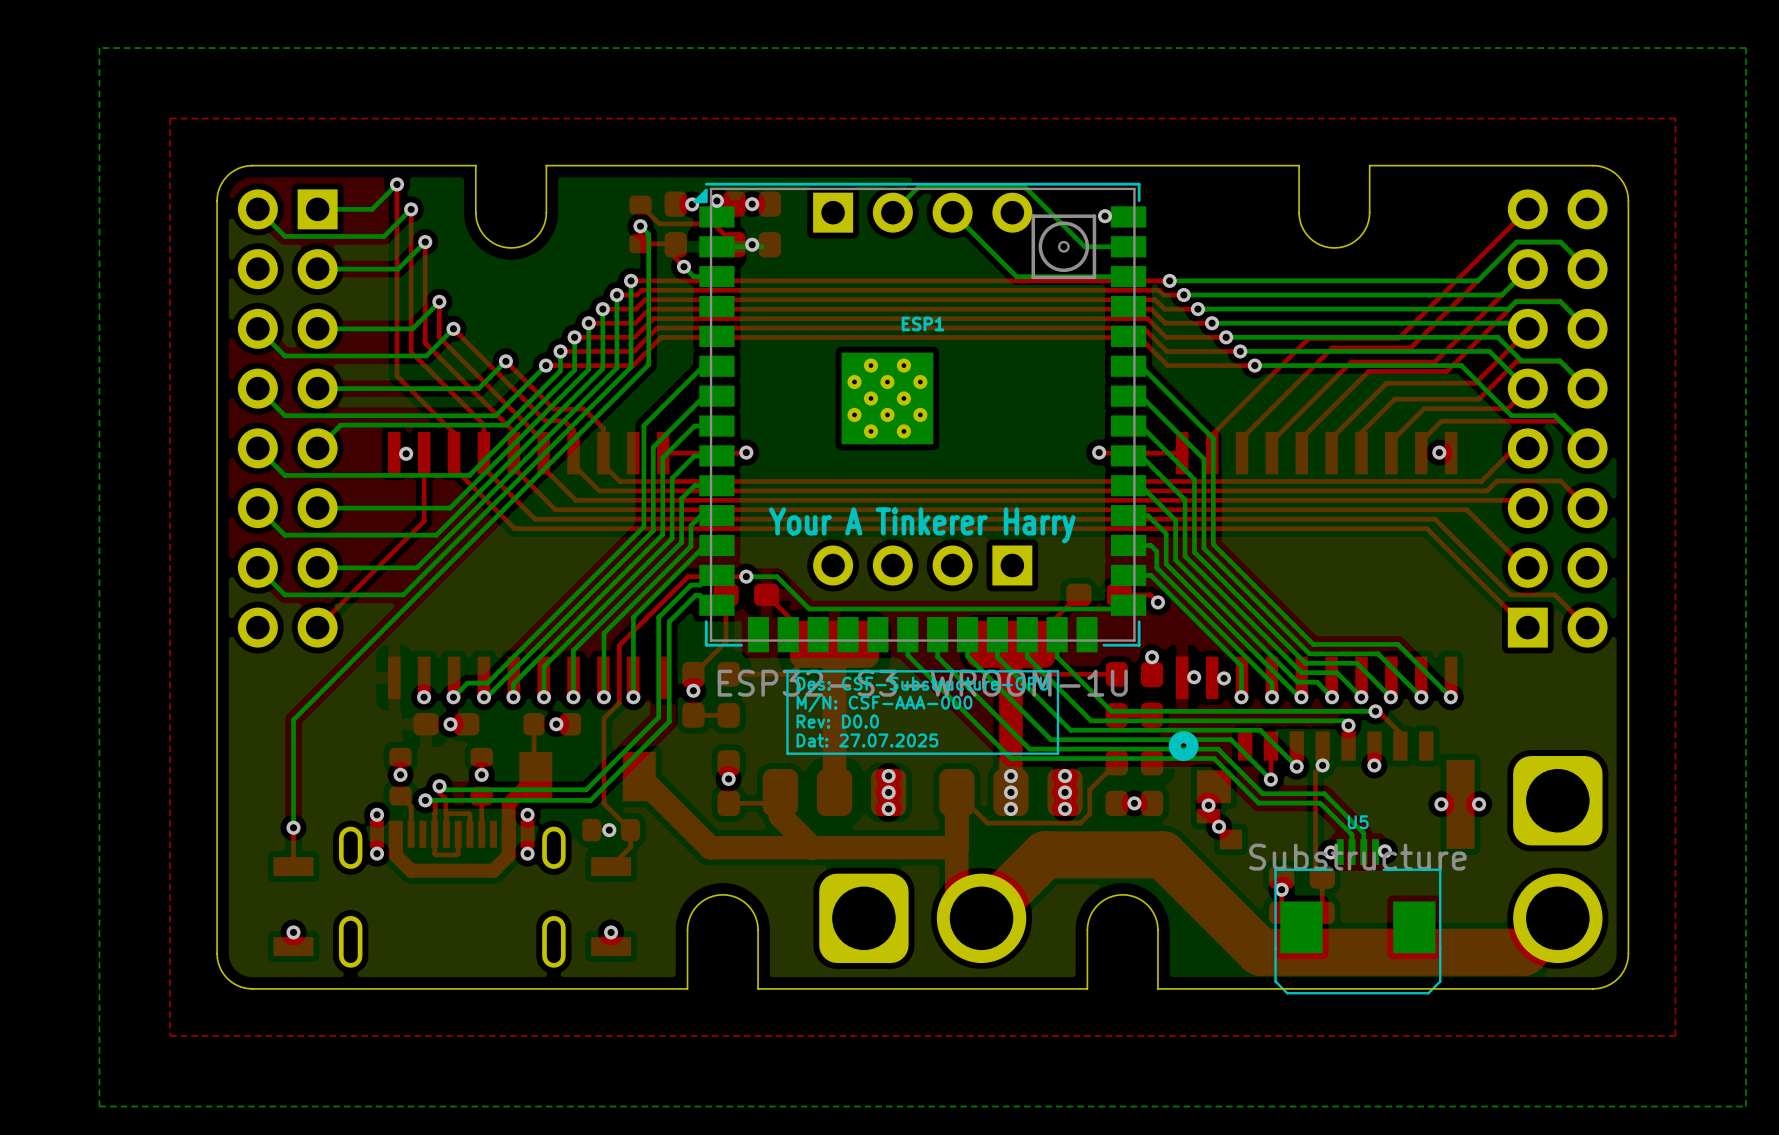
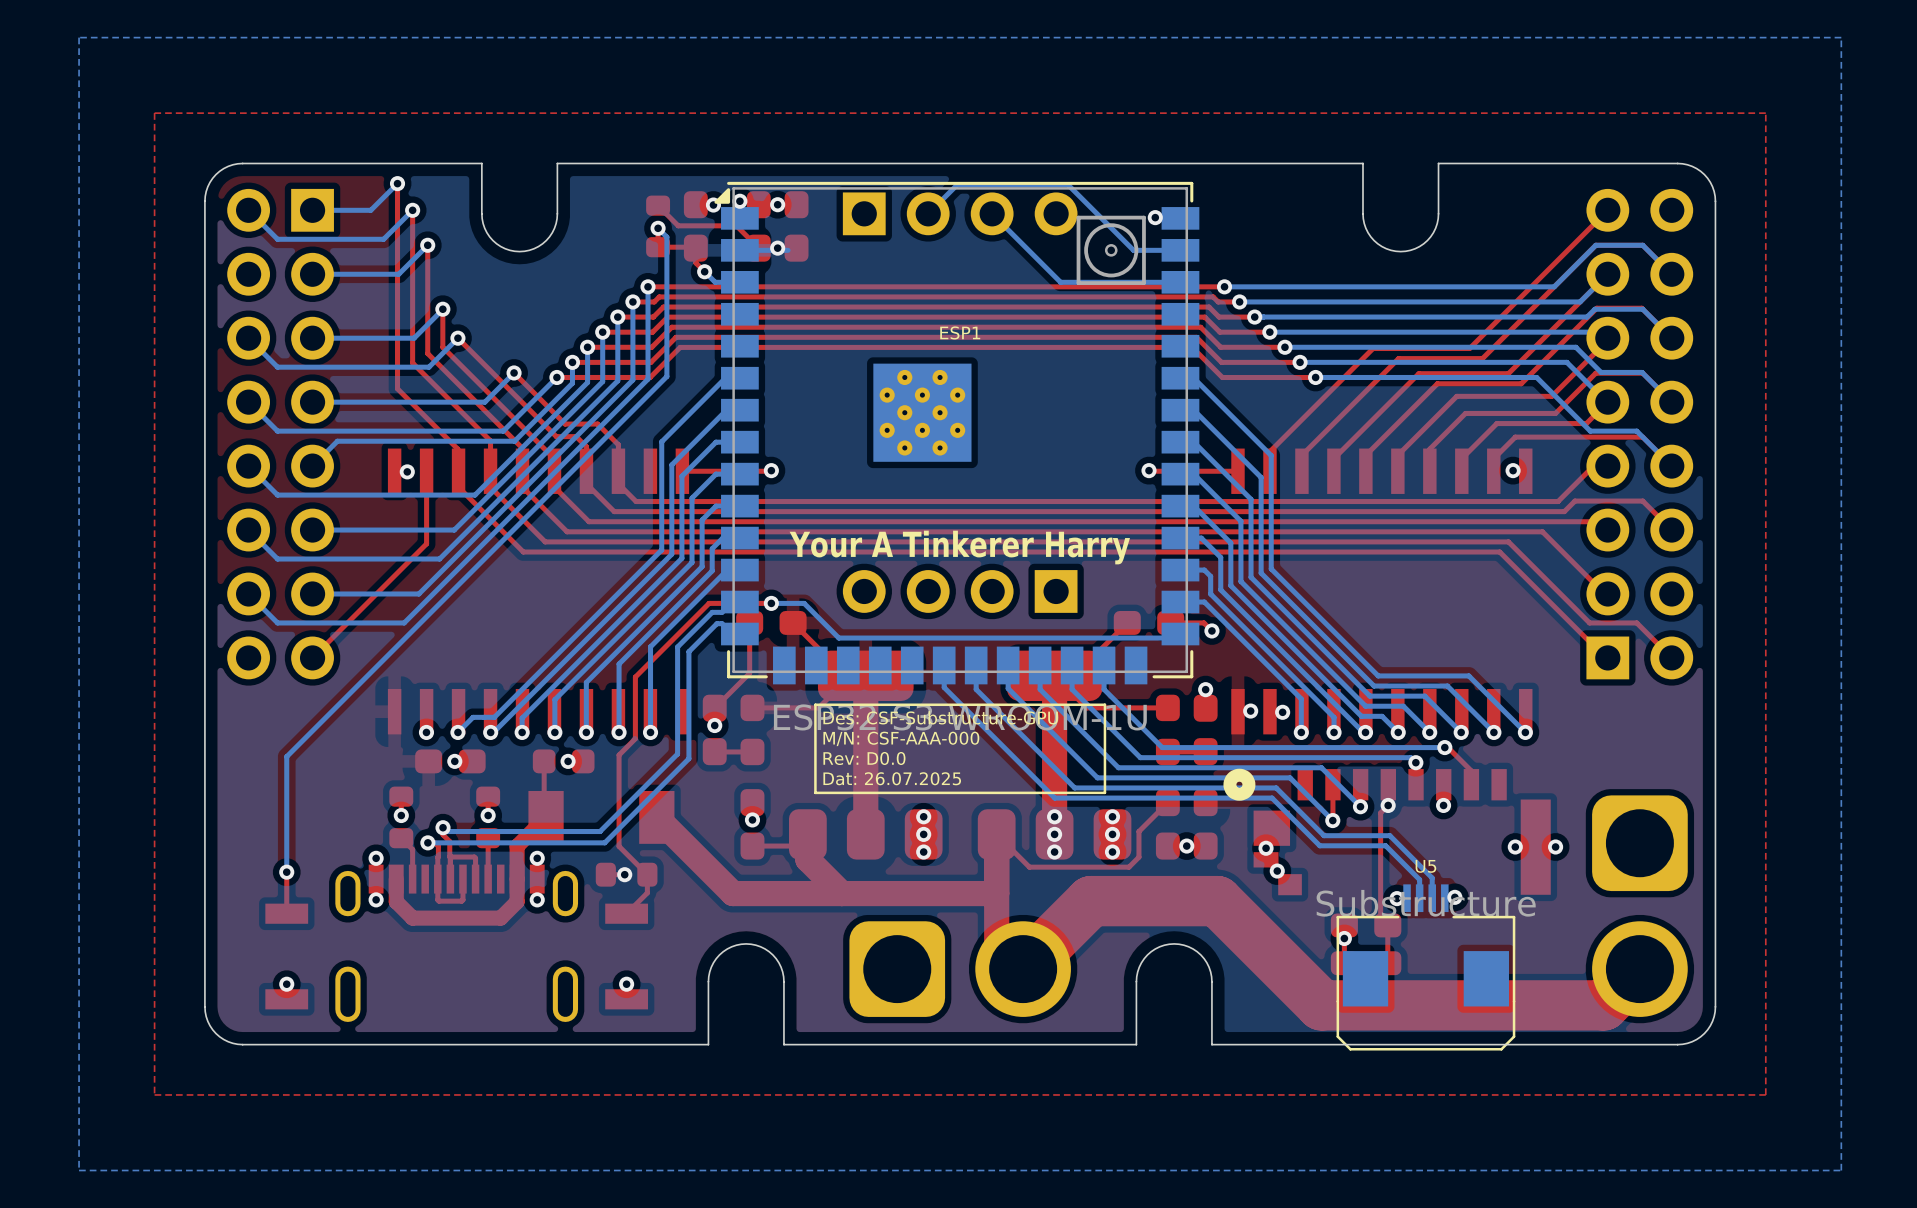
text: Dat: 27.07.2025 (867, 740) -> Dat: 26.07.2025 (892, 778)

